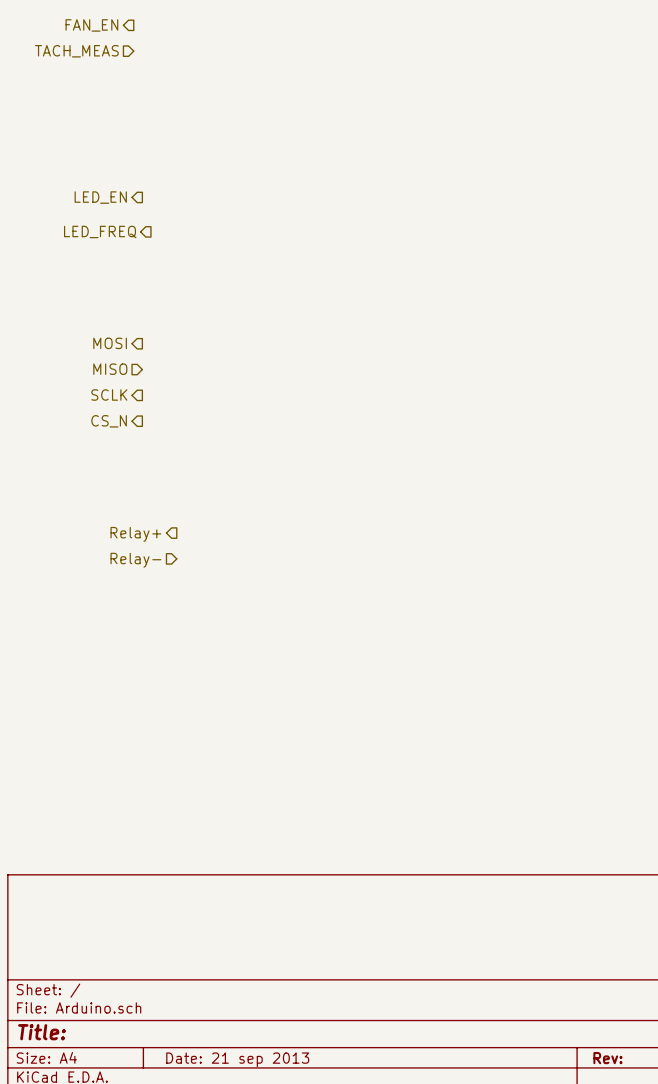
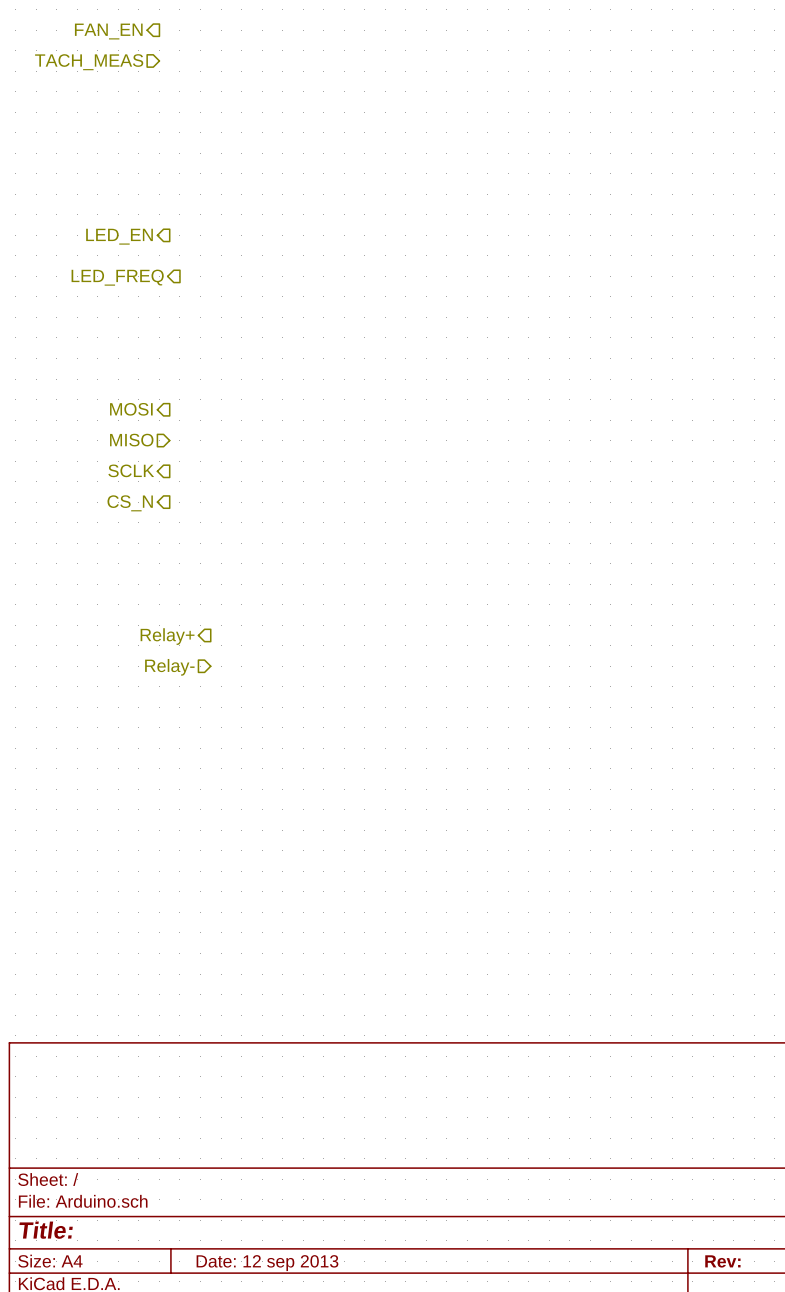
title block: Date: 21 sep 2013 (237, 1059) -> Date: 12 sep 2013 (267, 1263)

